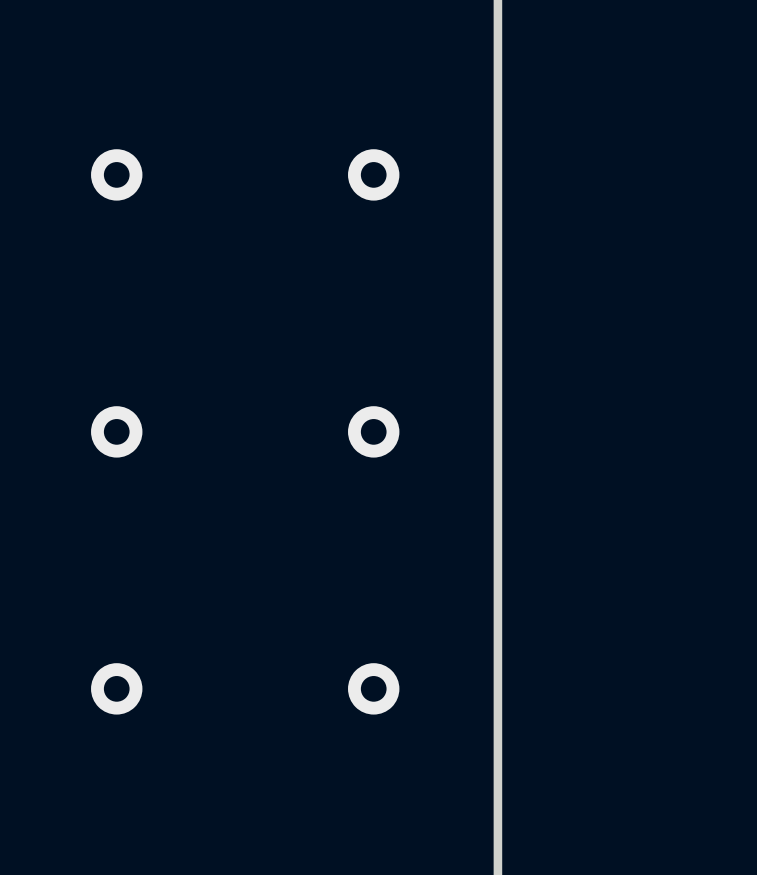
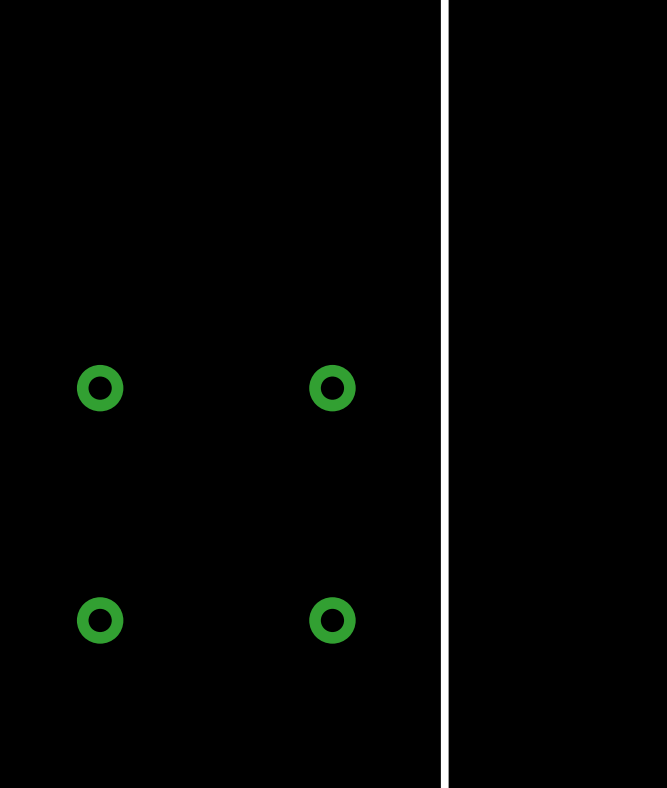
via: (116, 174) -> none
via: (373, 174) -> none

